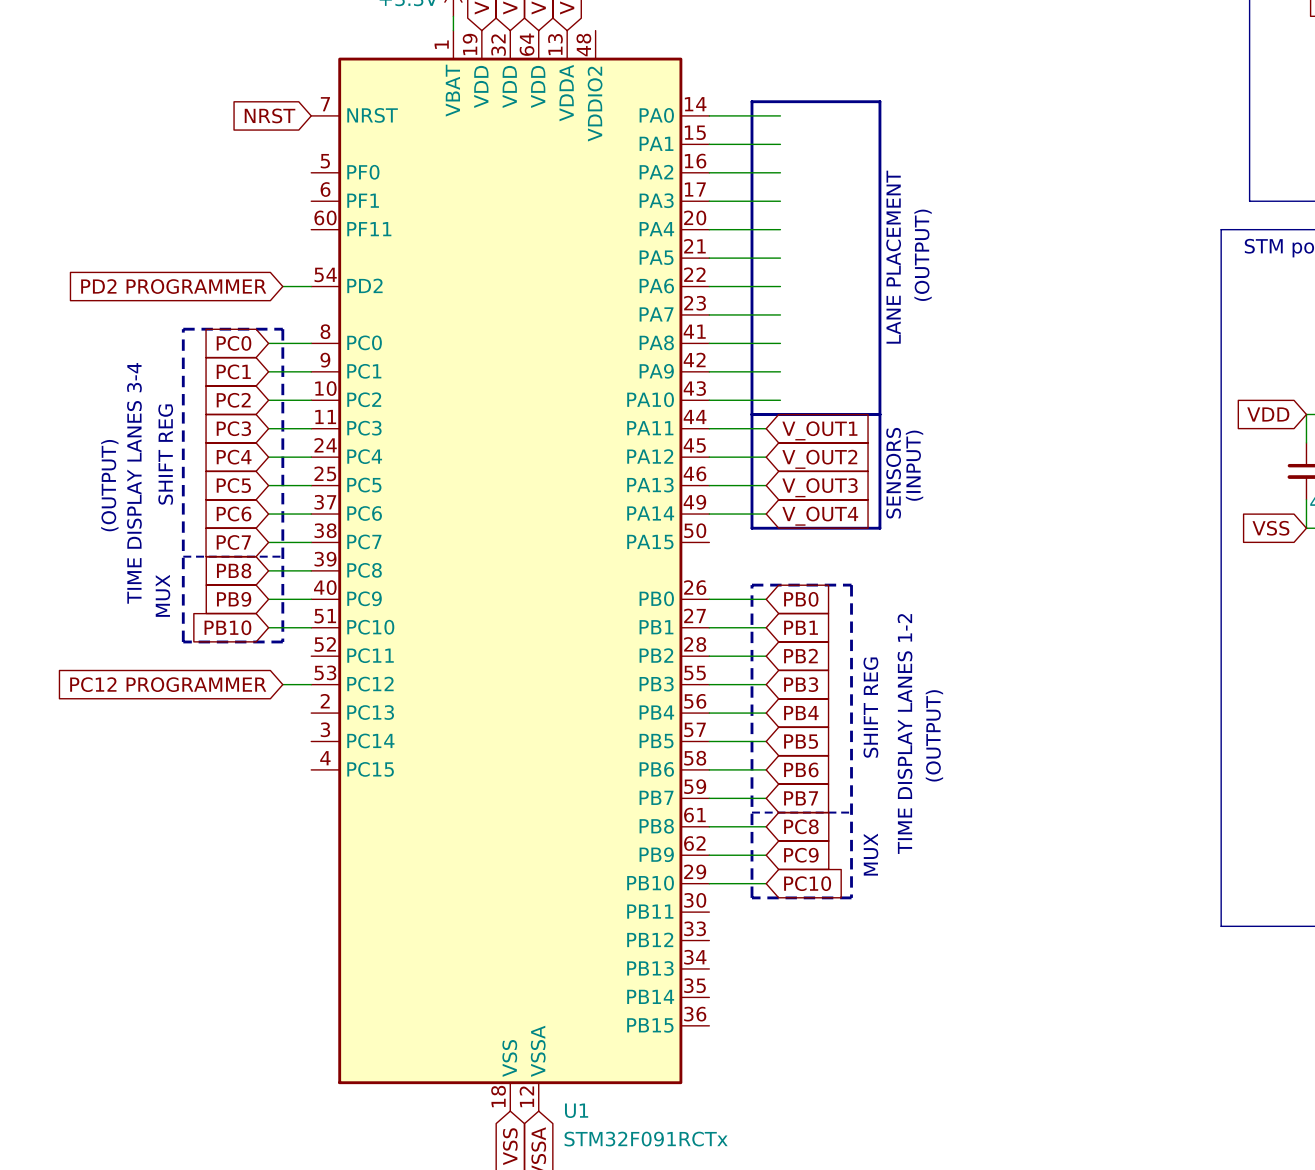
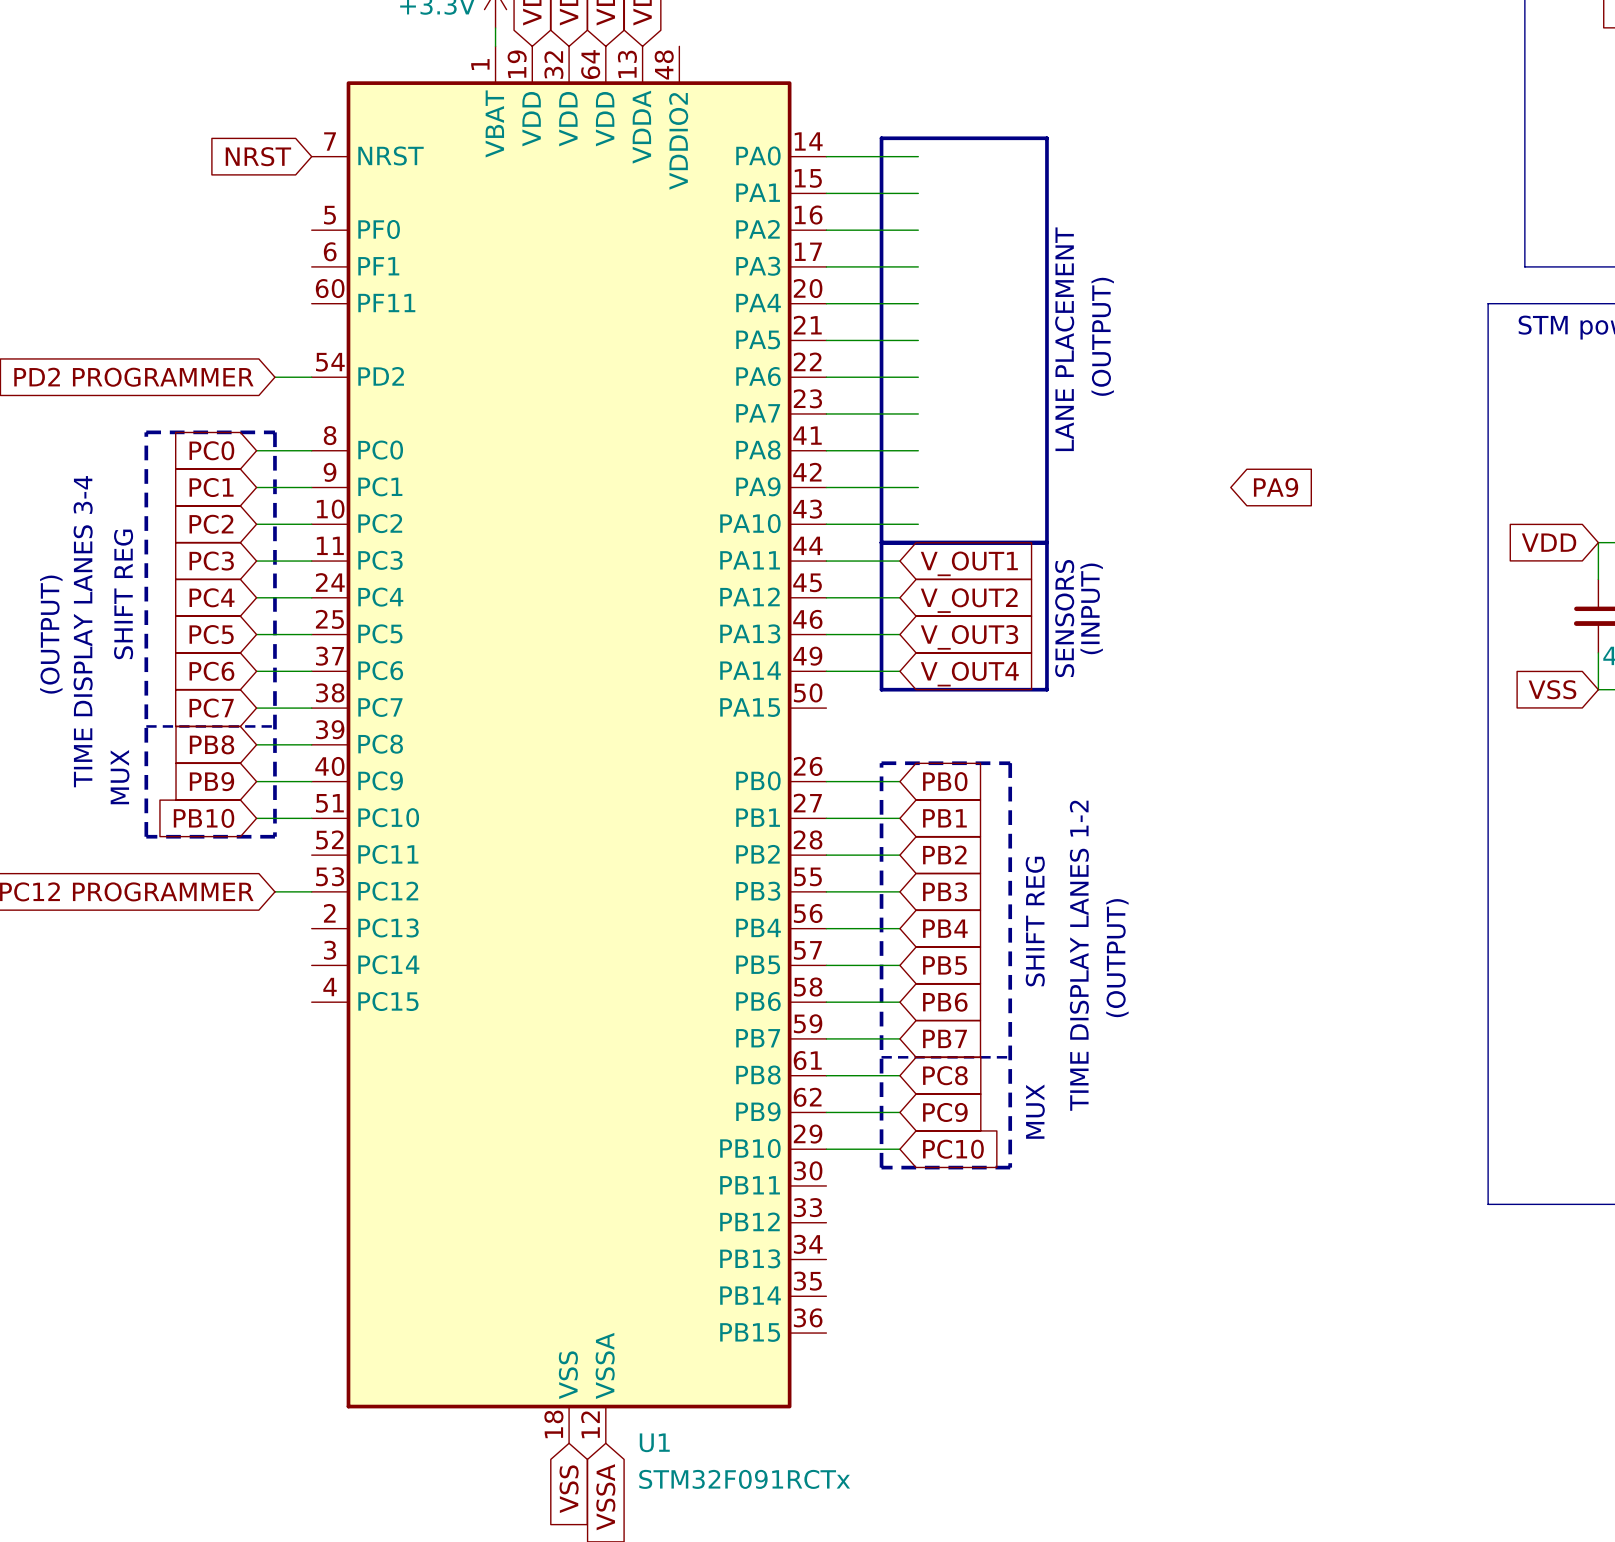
global label: none -> PA9 (1276, 487)

